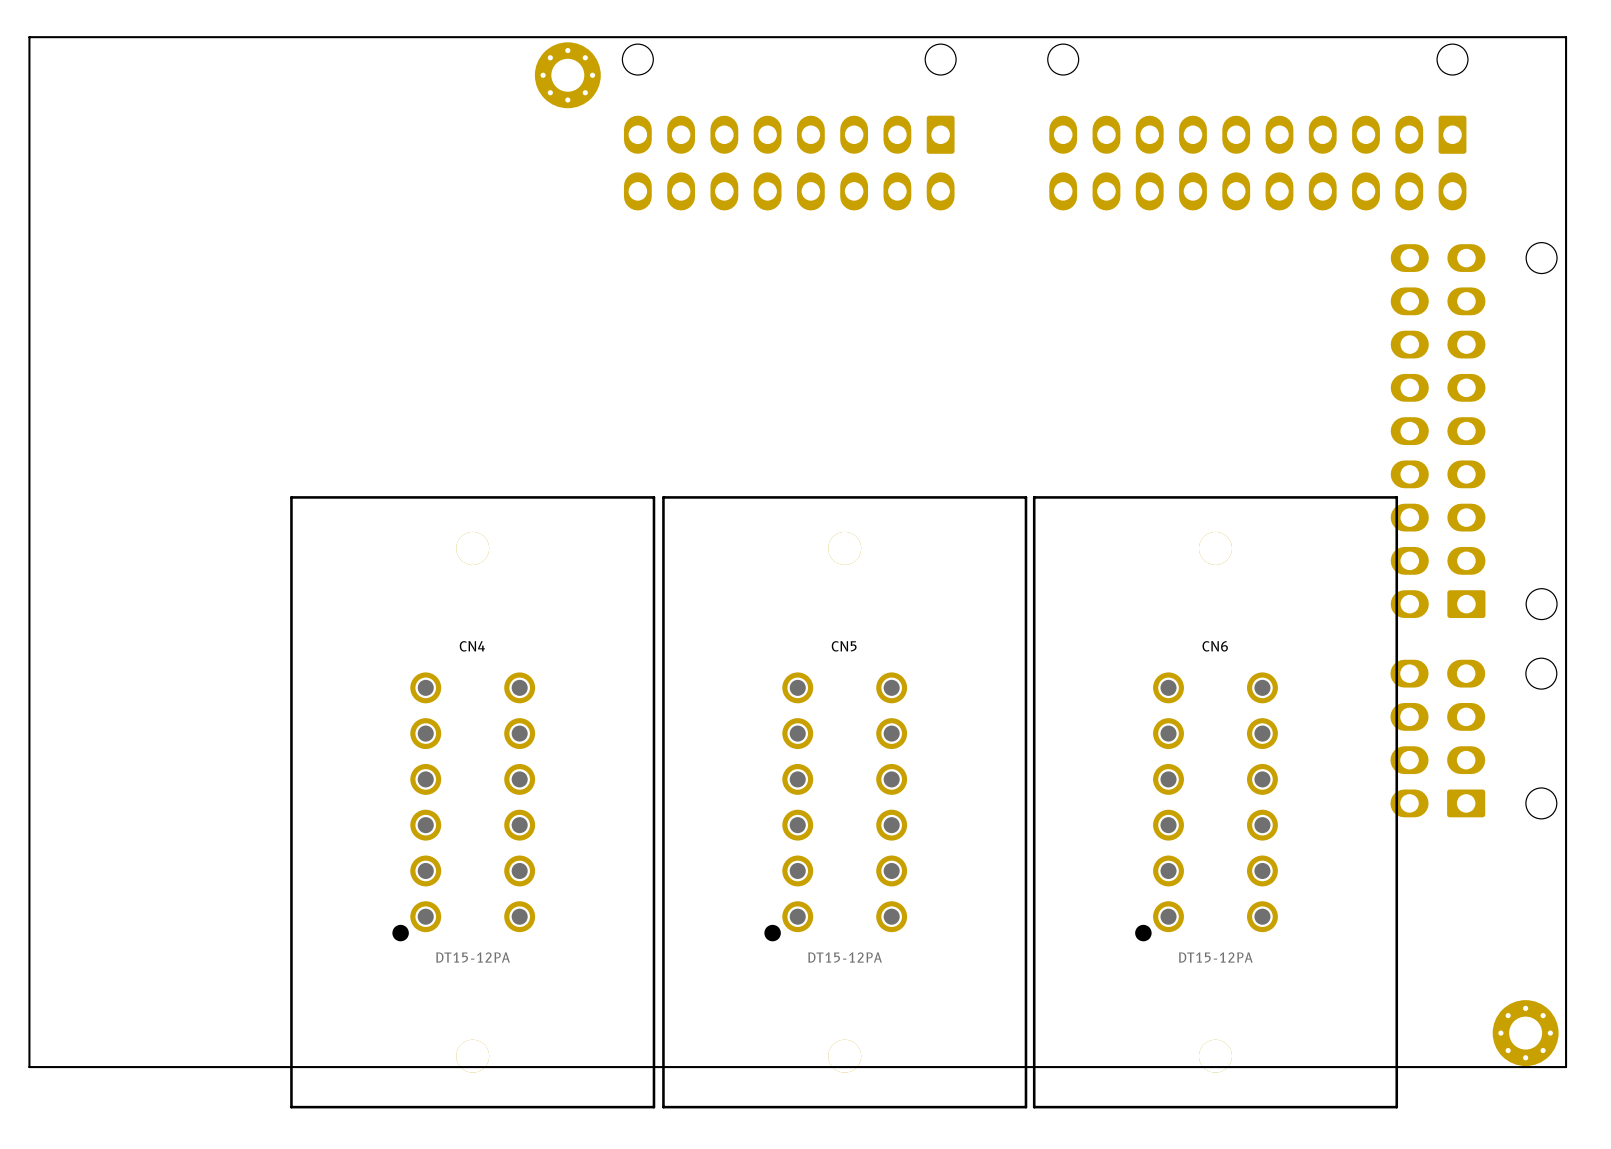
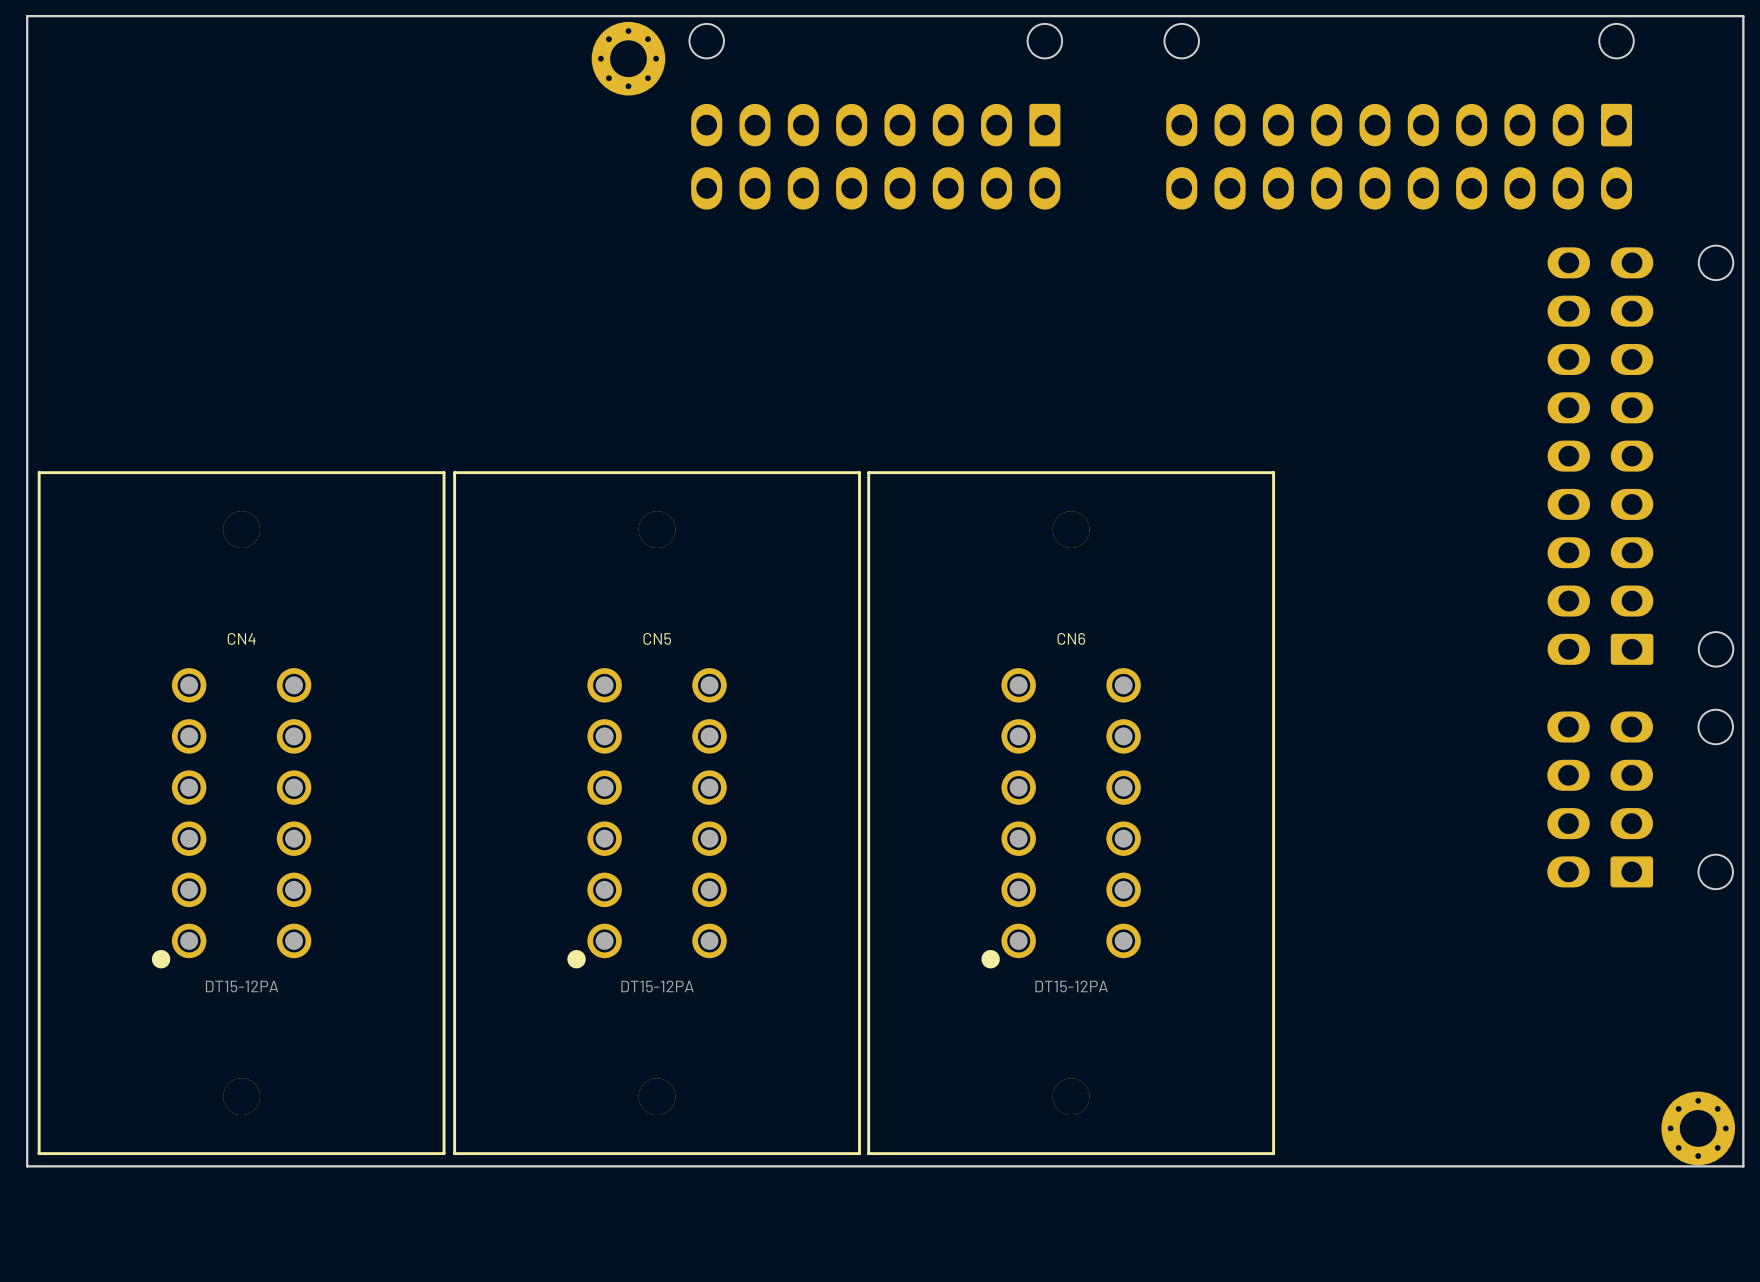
CN4 position: (472, 802) -> (241, 813)
CN5 position: (844, 802) -> (657, 813)
CN6 position: (1215, 802) -> (1071, 813)

